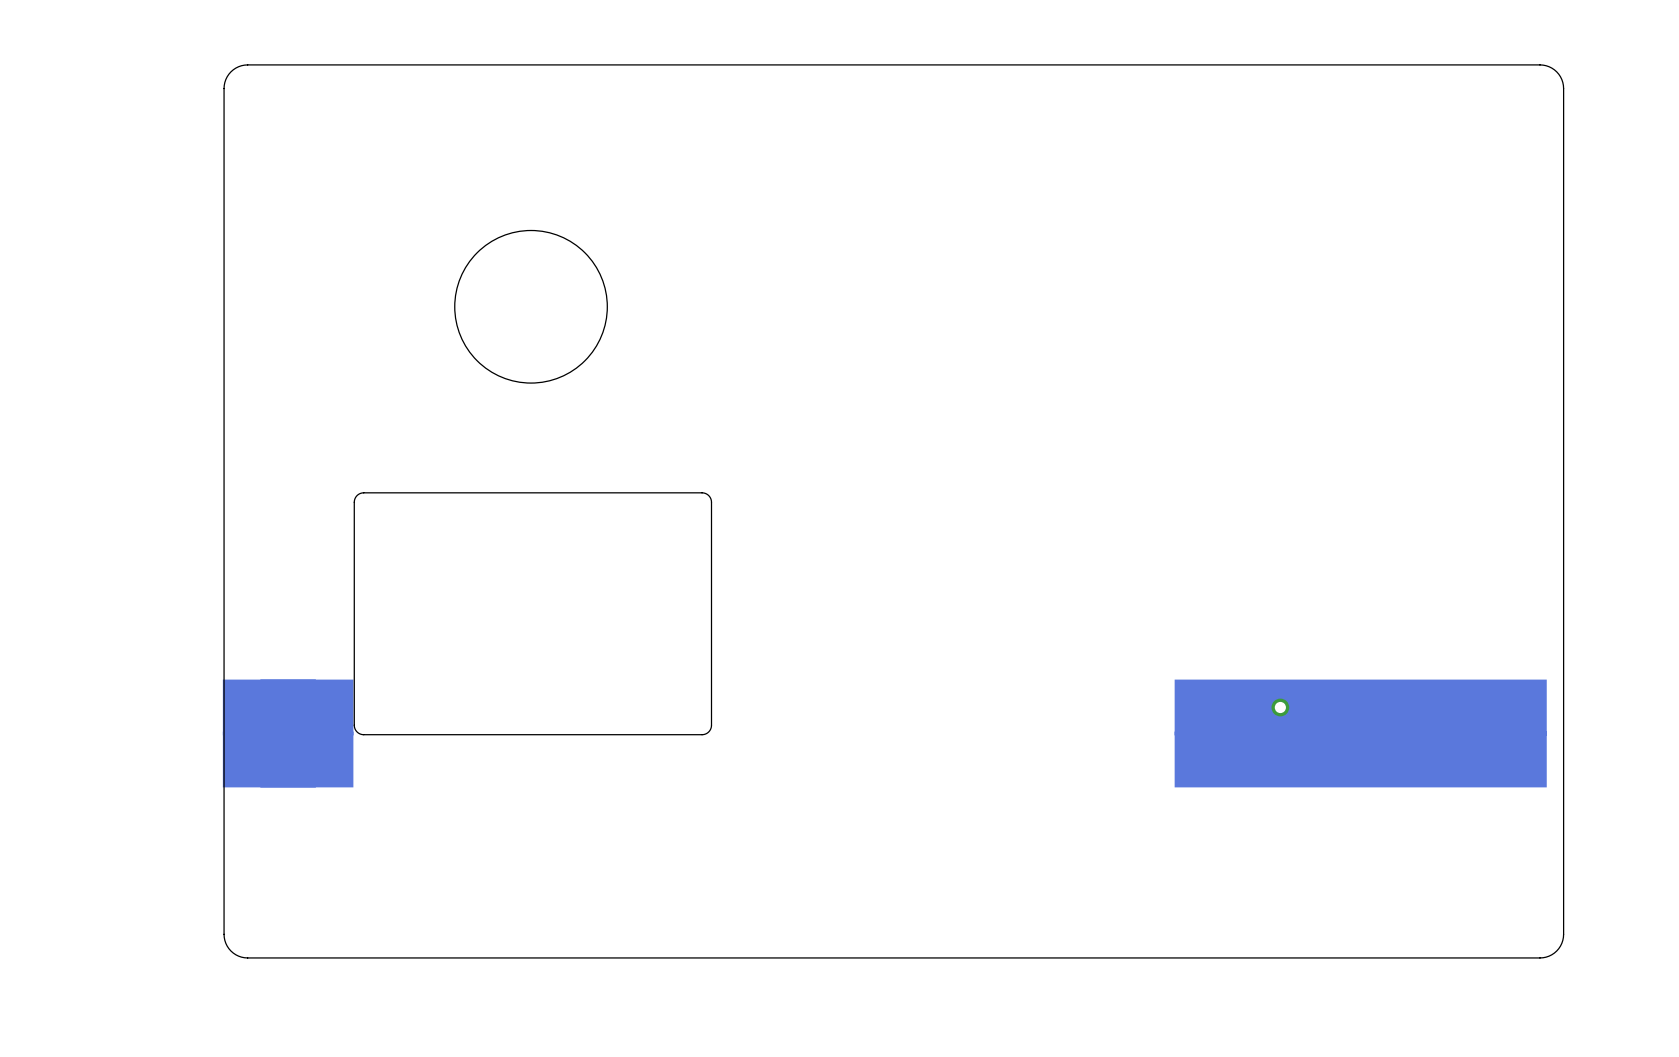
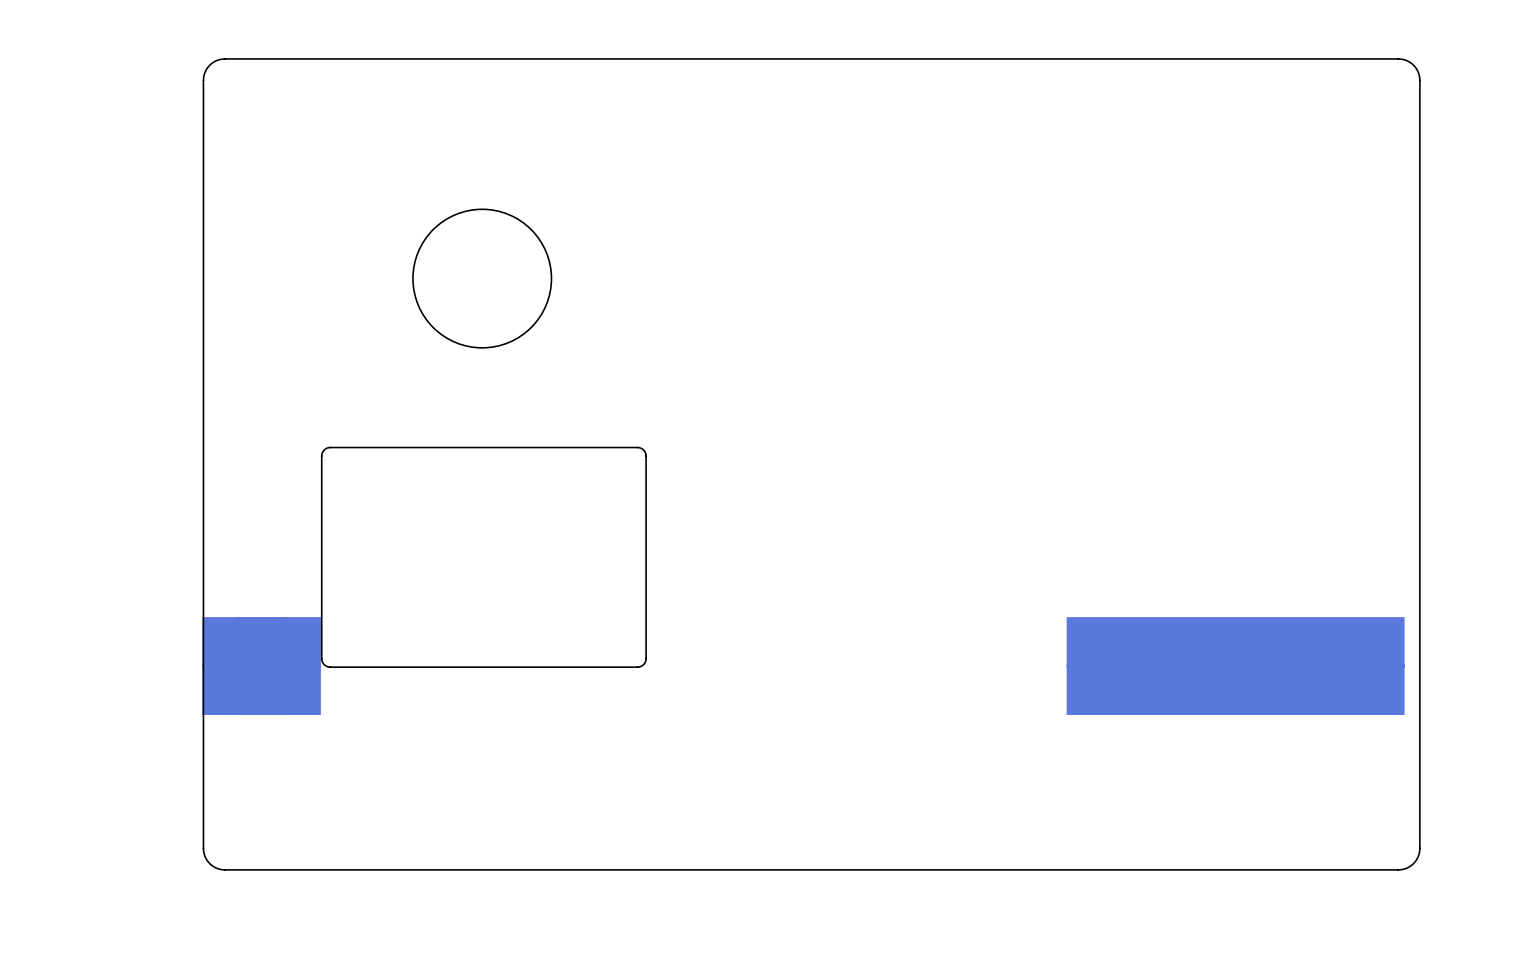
via: (1280, 707) -> none

